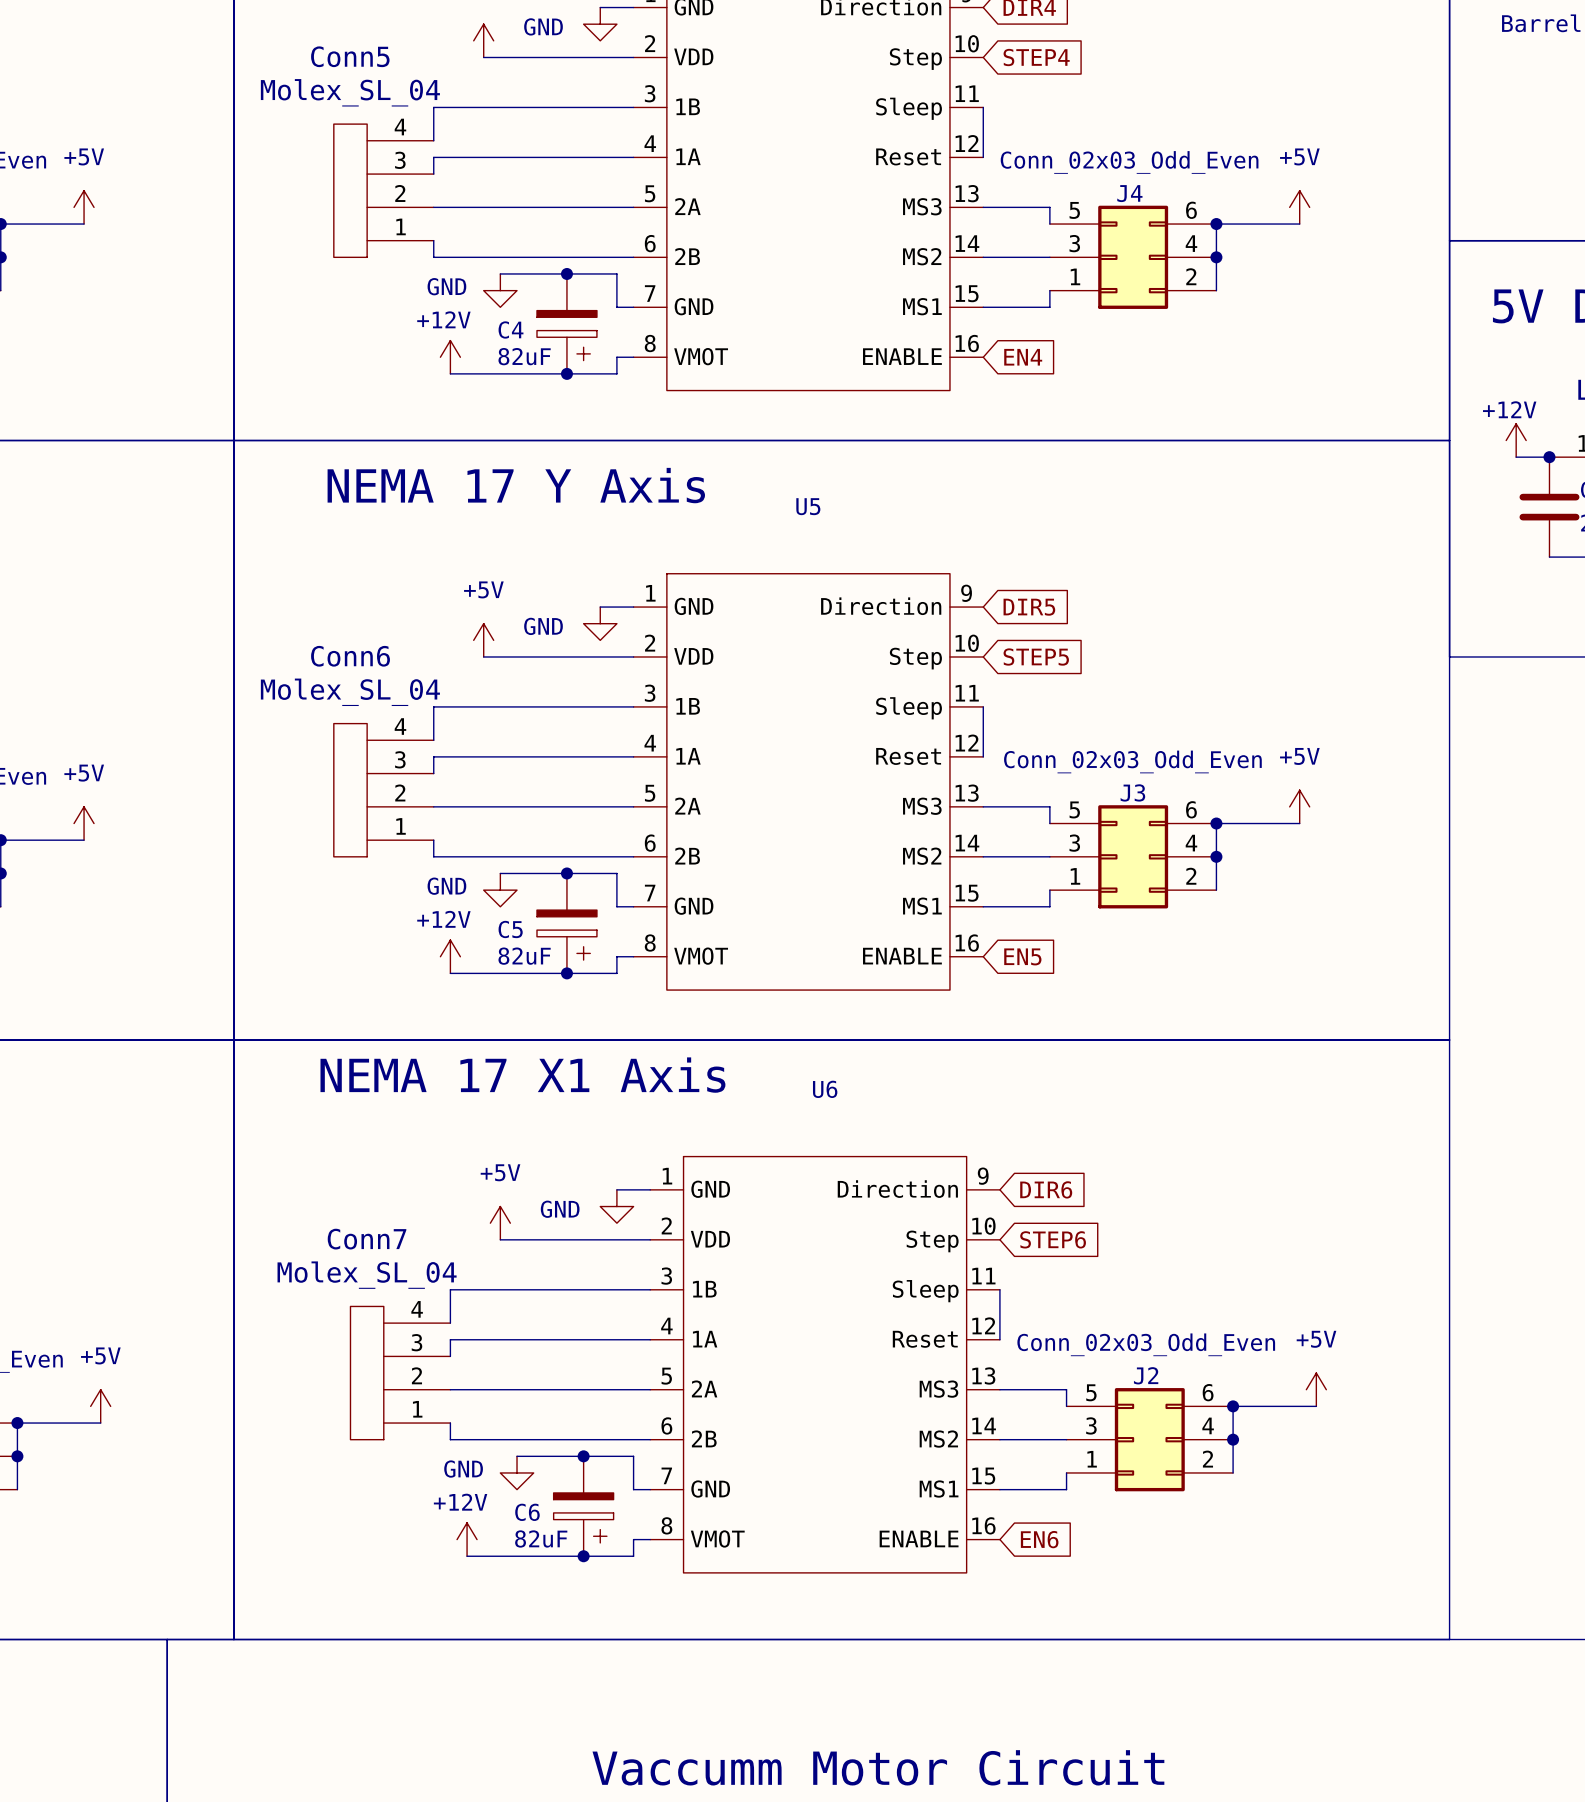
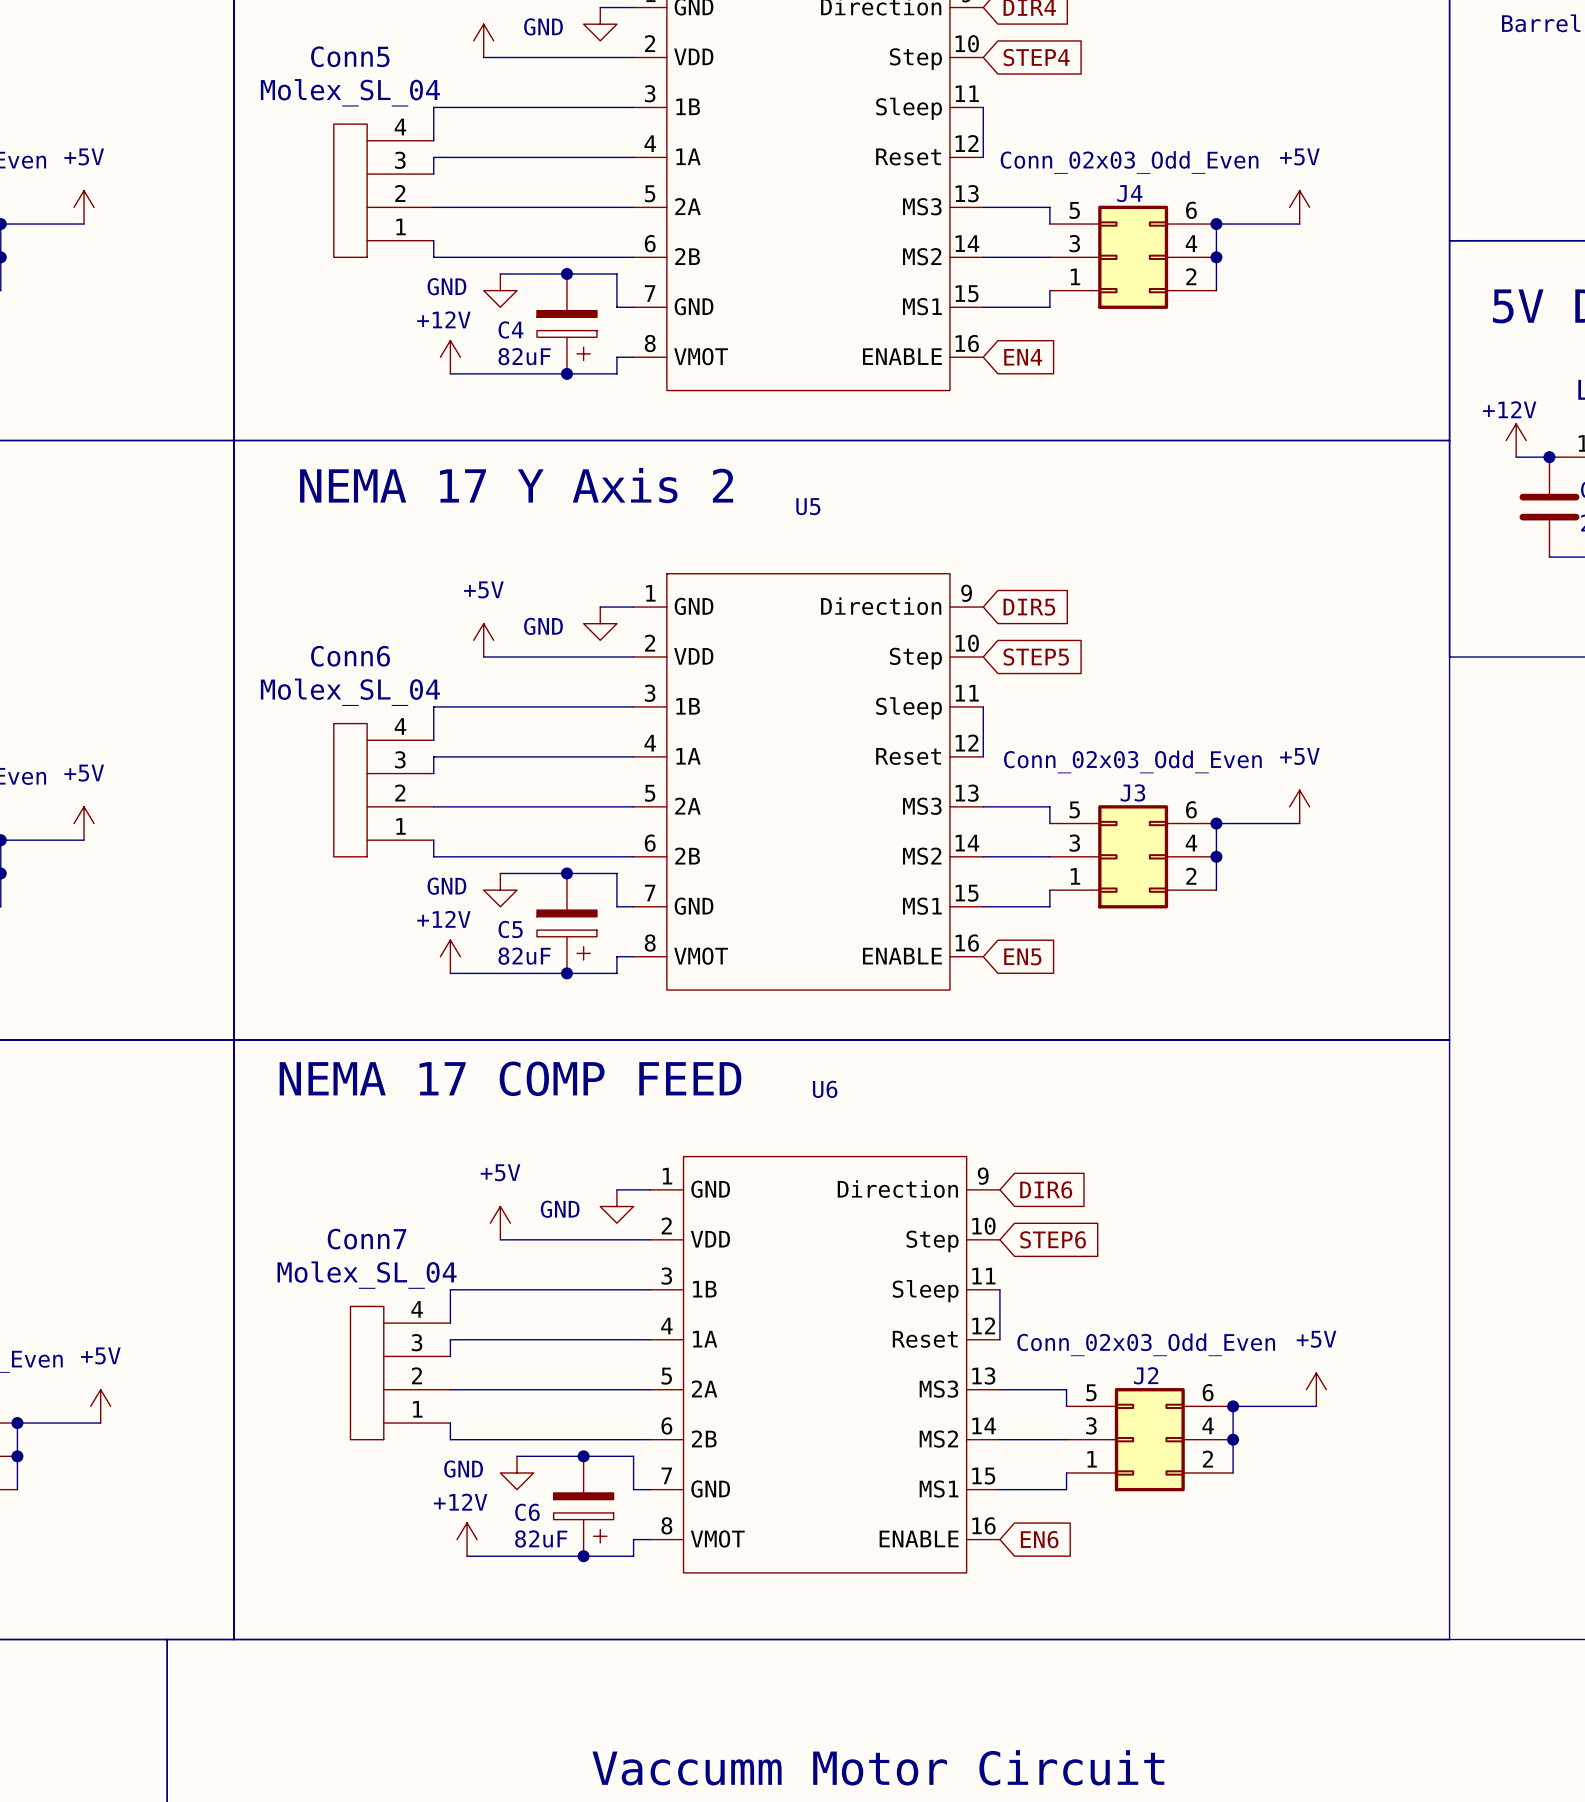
text: NEMA 17 Y Axis (516, 485) -> NEMA 17 Y Axis 2 (516, 485)
text: NEMA 17 X1 Axis (522, 1075) -> none
text: none -> NEMA 17 COMP FEED (510, 1078)

